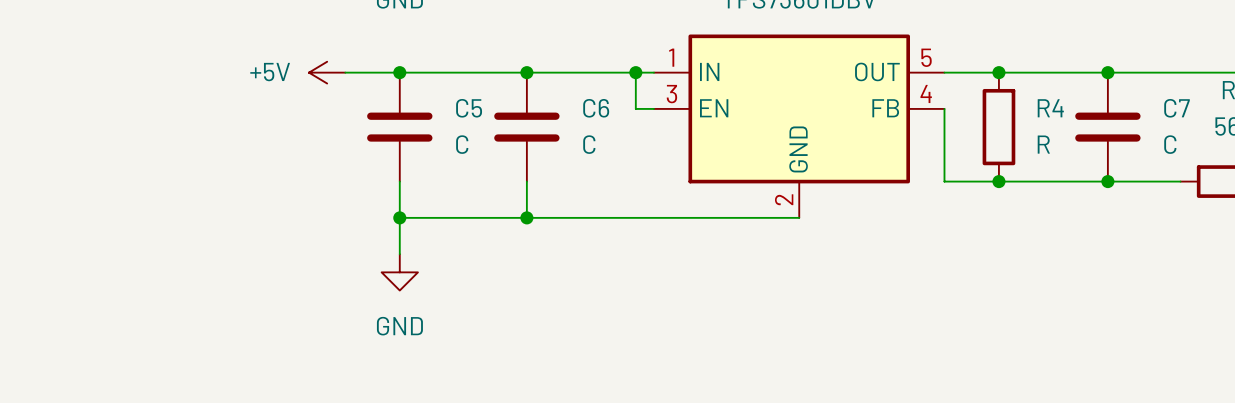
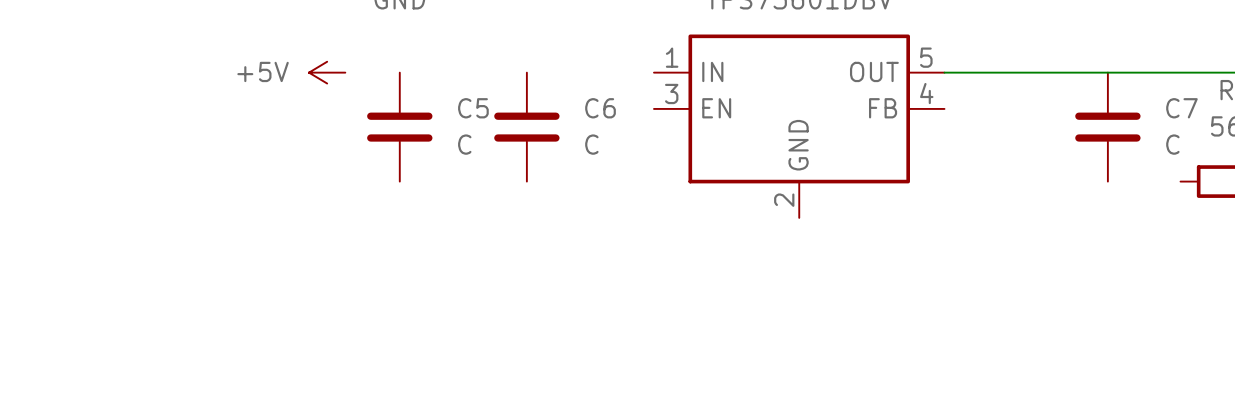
wire: (345, 72) (653, 72) -> none
junction: (399, 72) -> none
junction: (526, 72) -> none
wire: (635, 72) (635, 108) (653, 108) -> none
junction: (635, 72) -> none
junction: (998, 72) -> none
junction: (1107, 72) -> none
wire: (944, 108) (944, 181) (1180, 181) -> none
R4: R (998, 127) -> none
wire: (399, 181) (399, 254) -> none
wire: (526, 181) (526, 217) -> none
junction: (998, 181) -> none
junction: (1107, 181) -> none
wire: (399, 217) (799, 217) -> none
junction: (399, 217) -> none
junction: (526, 217) -> none
power symbol: GND (399, 272) -> none

